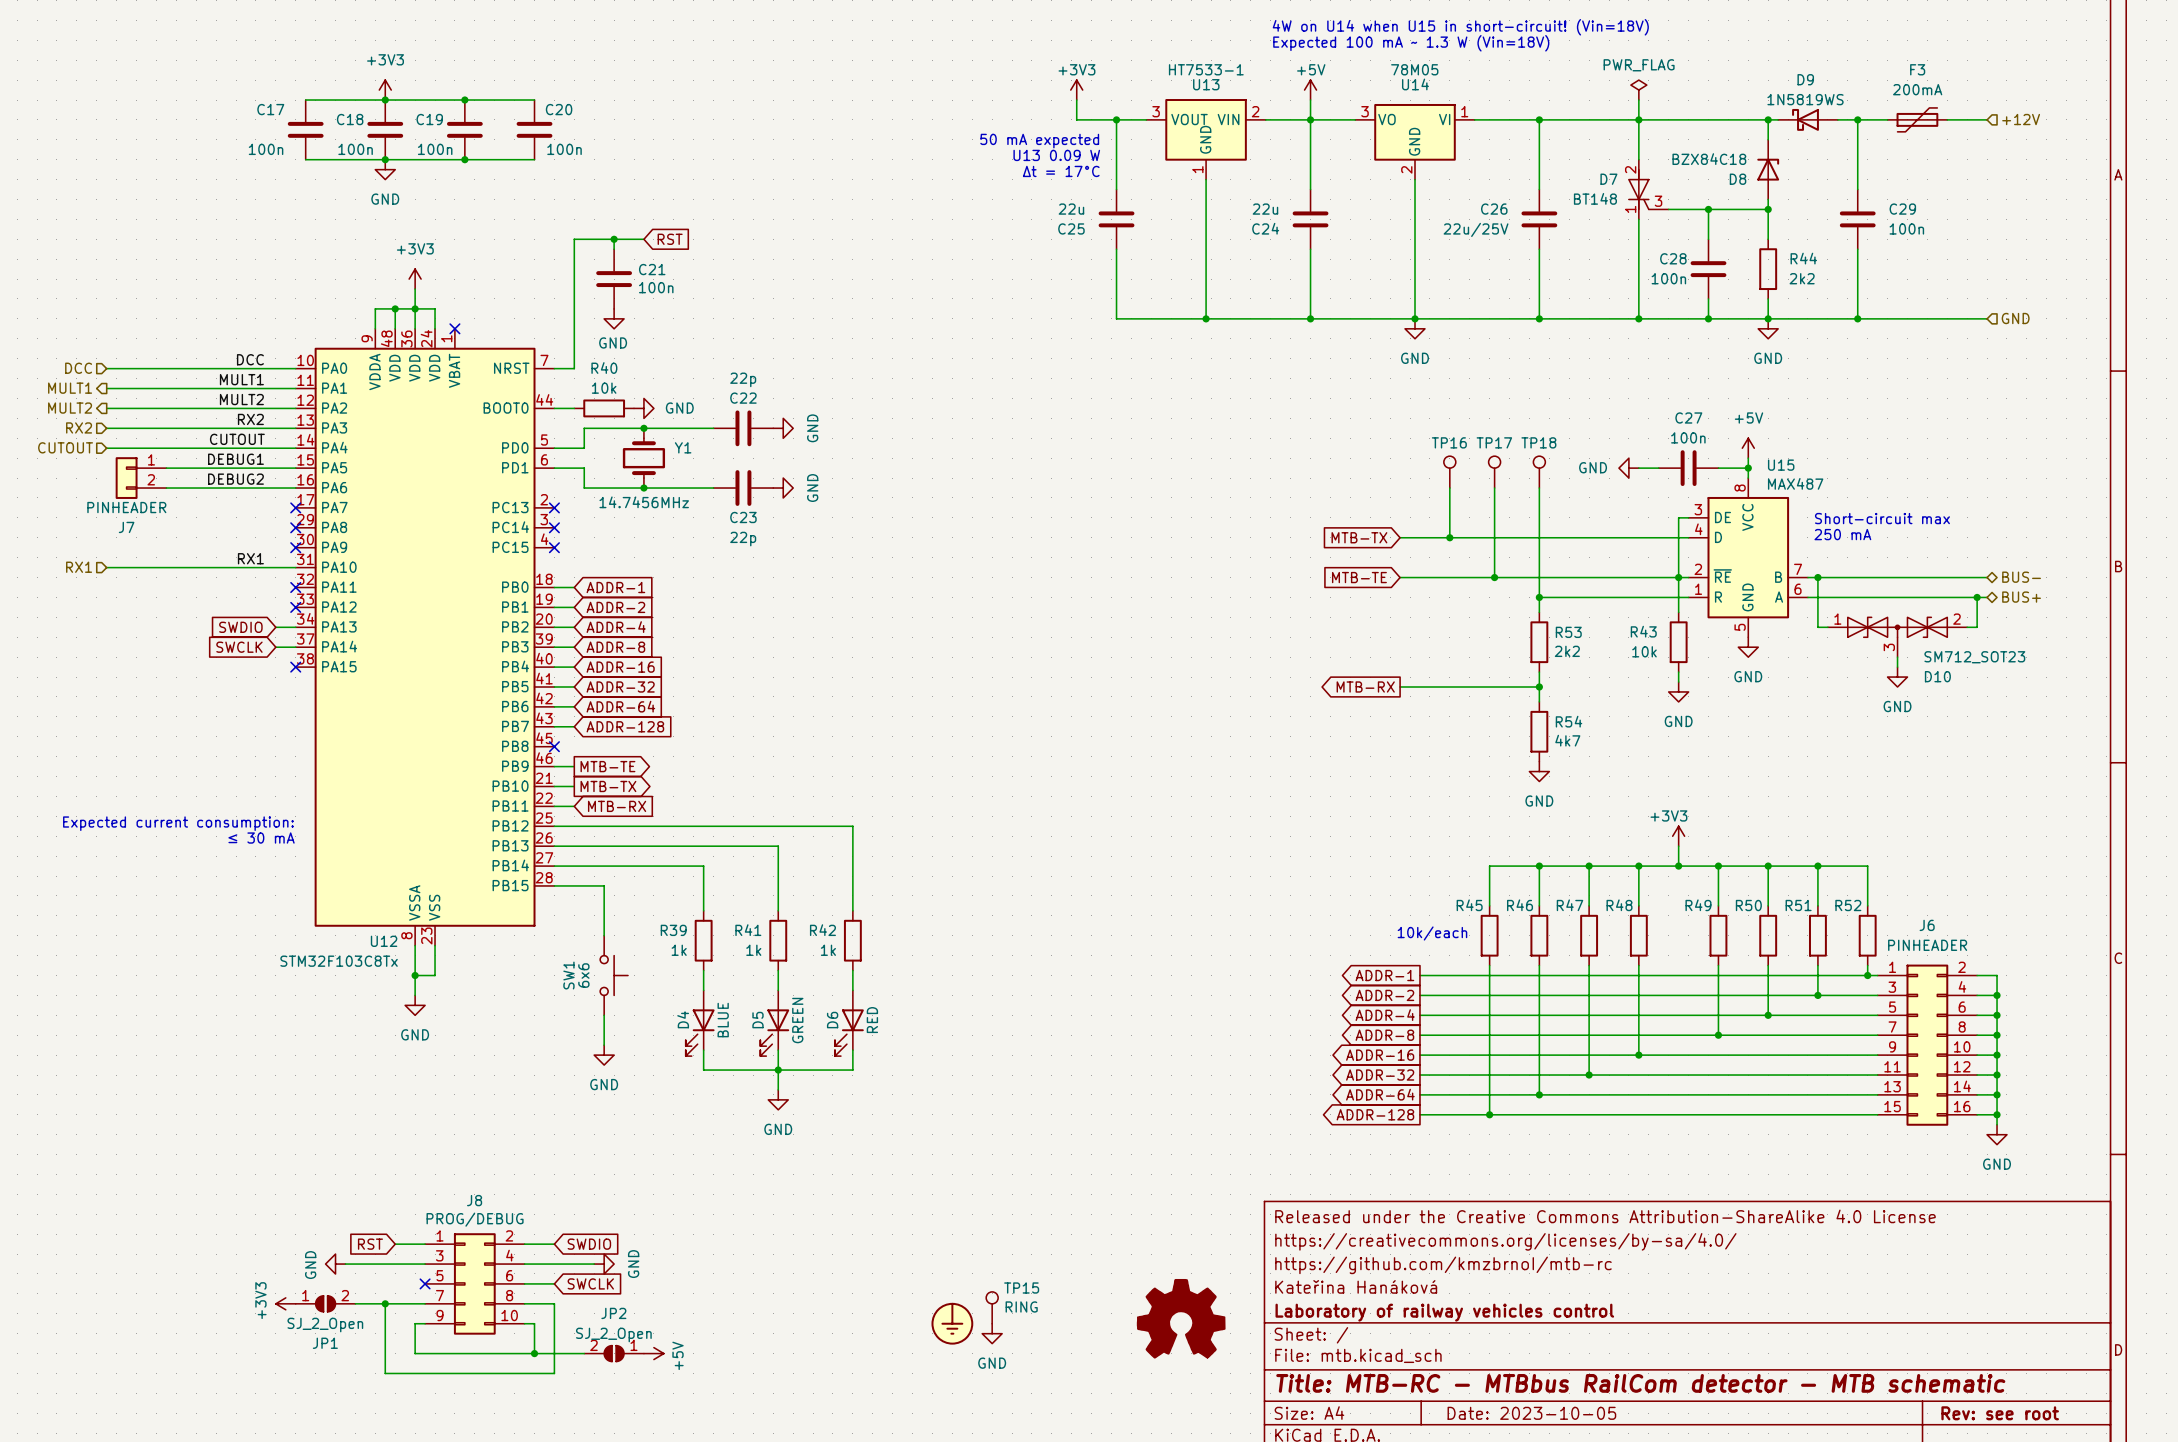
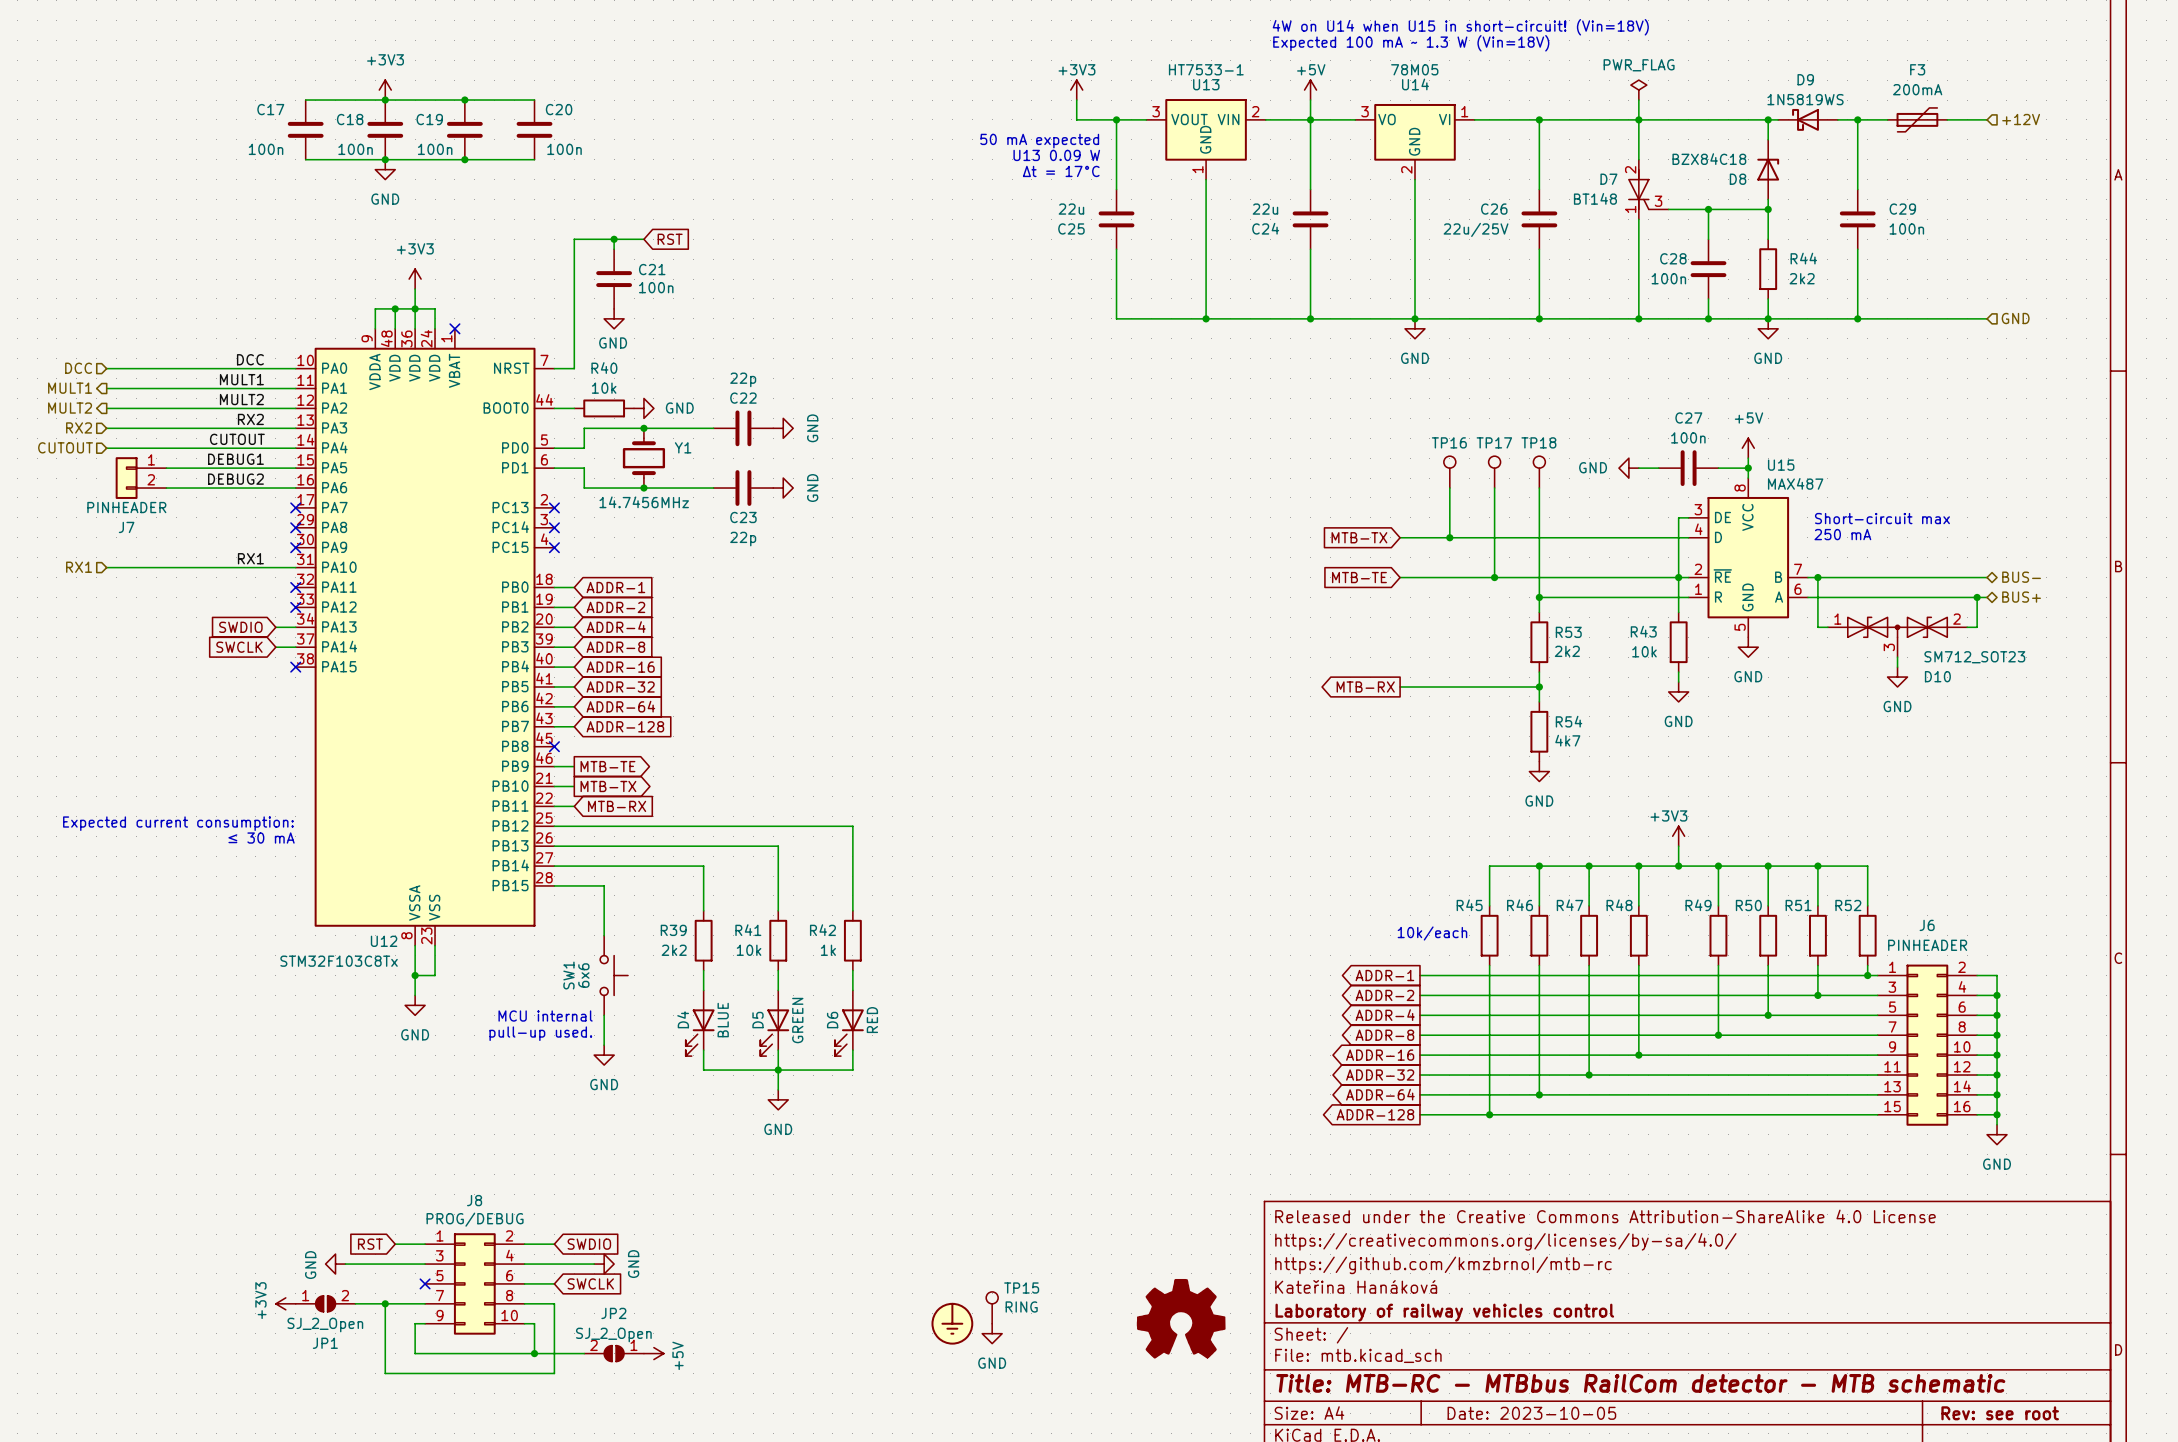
R39 value: 1k (679, 950) -> 2k2 (674, 950)
R41 value: 1k (753, 950) -> 10k (749, 950)
text: none -> MCU internal (545, 1016)
text: none -> pull-up used. (540, 1033)

